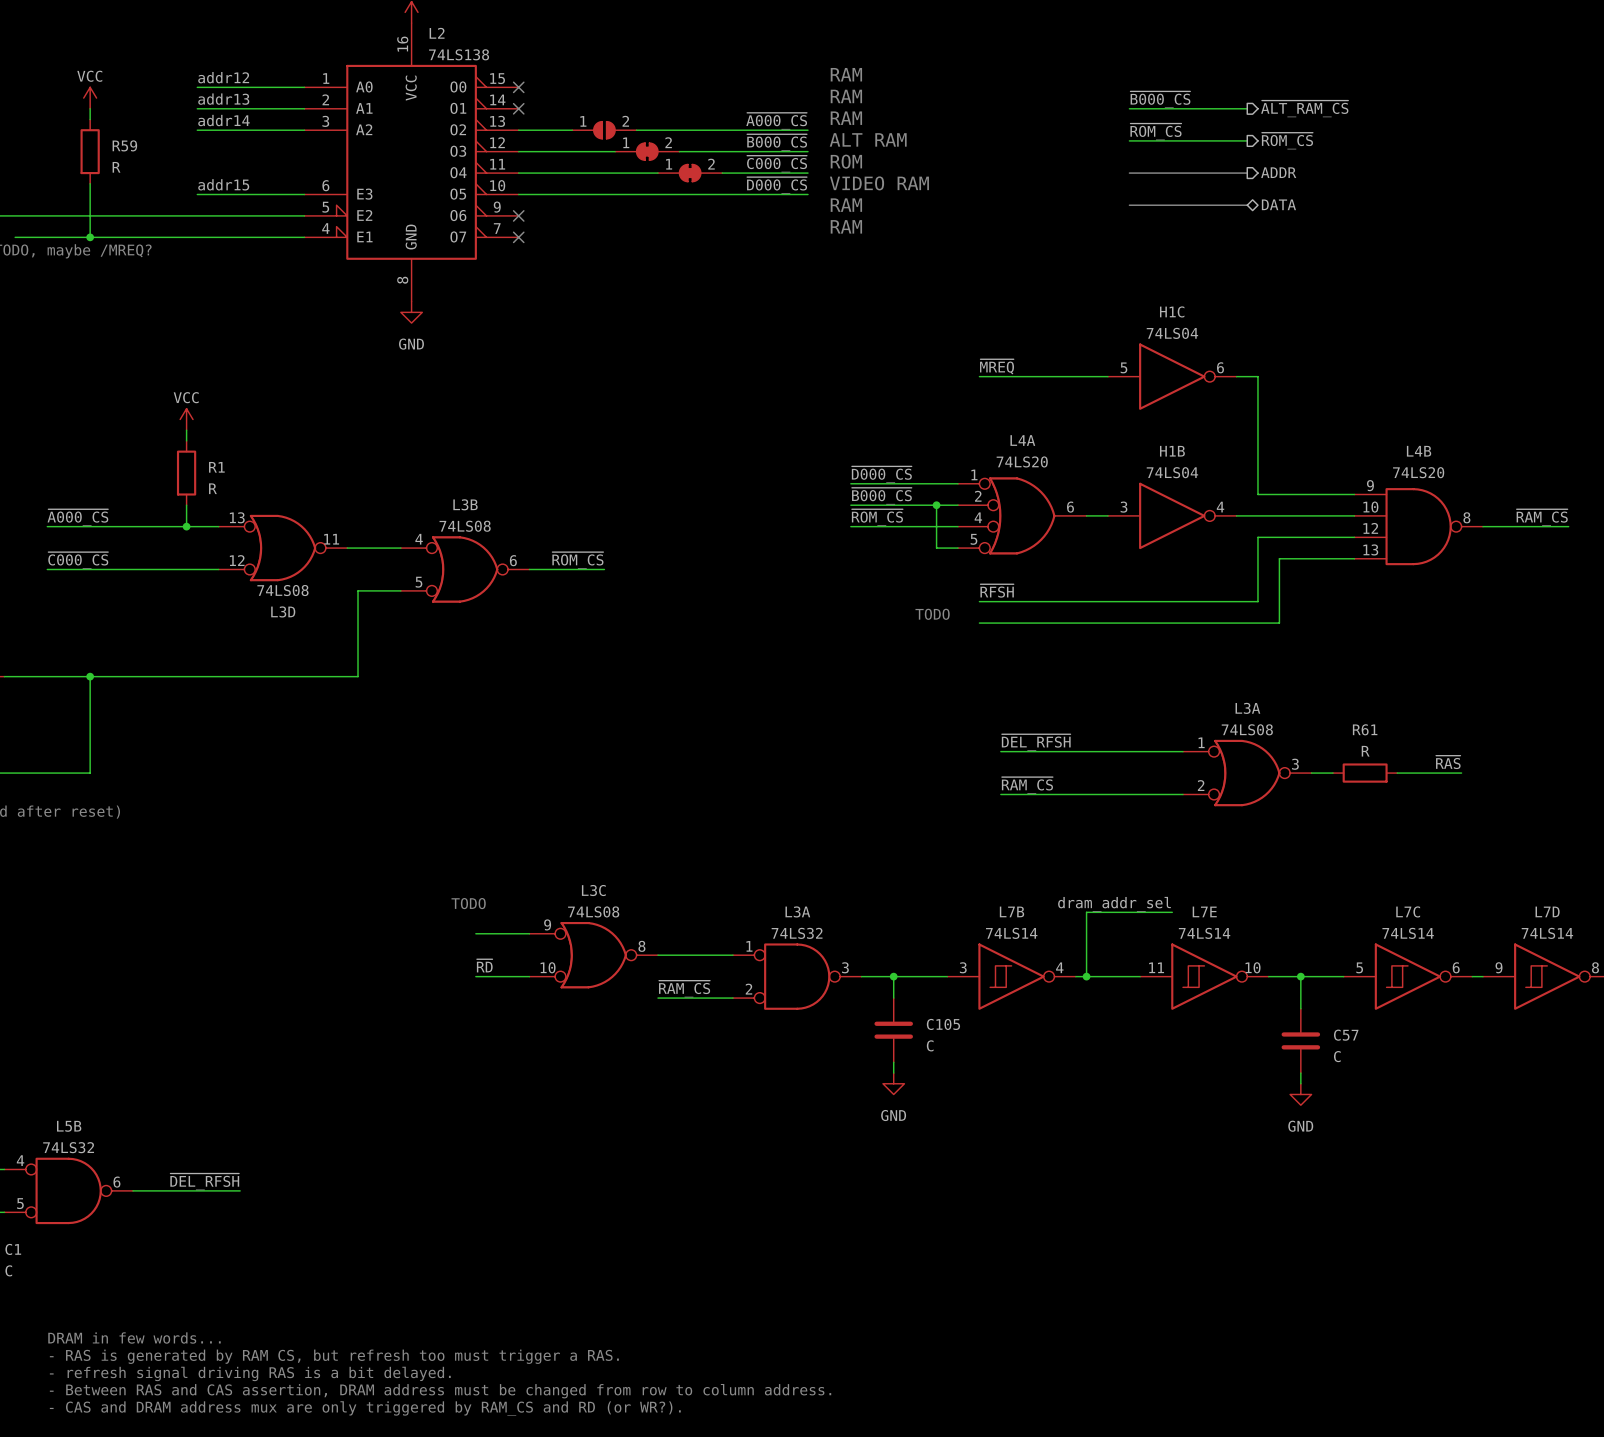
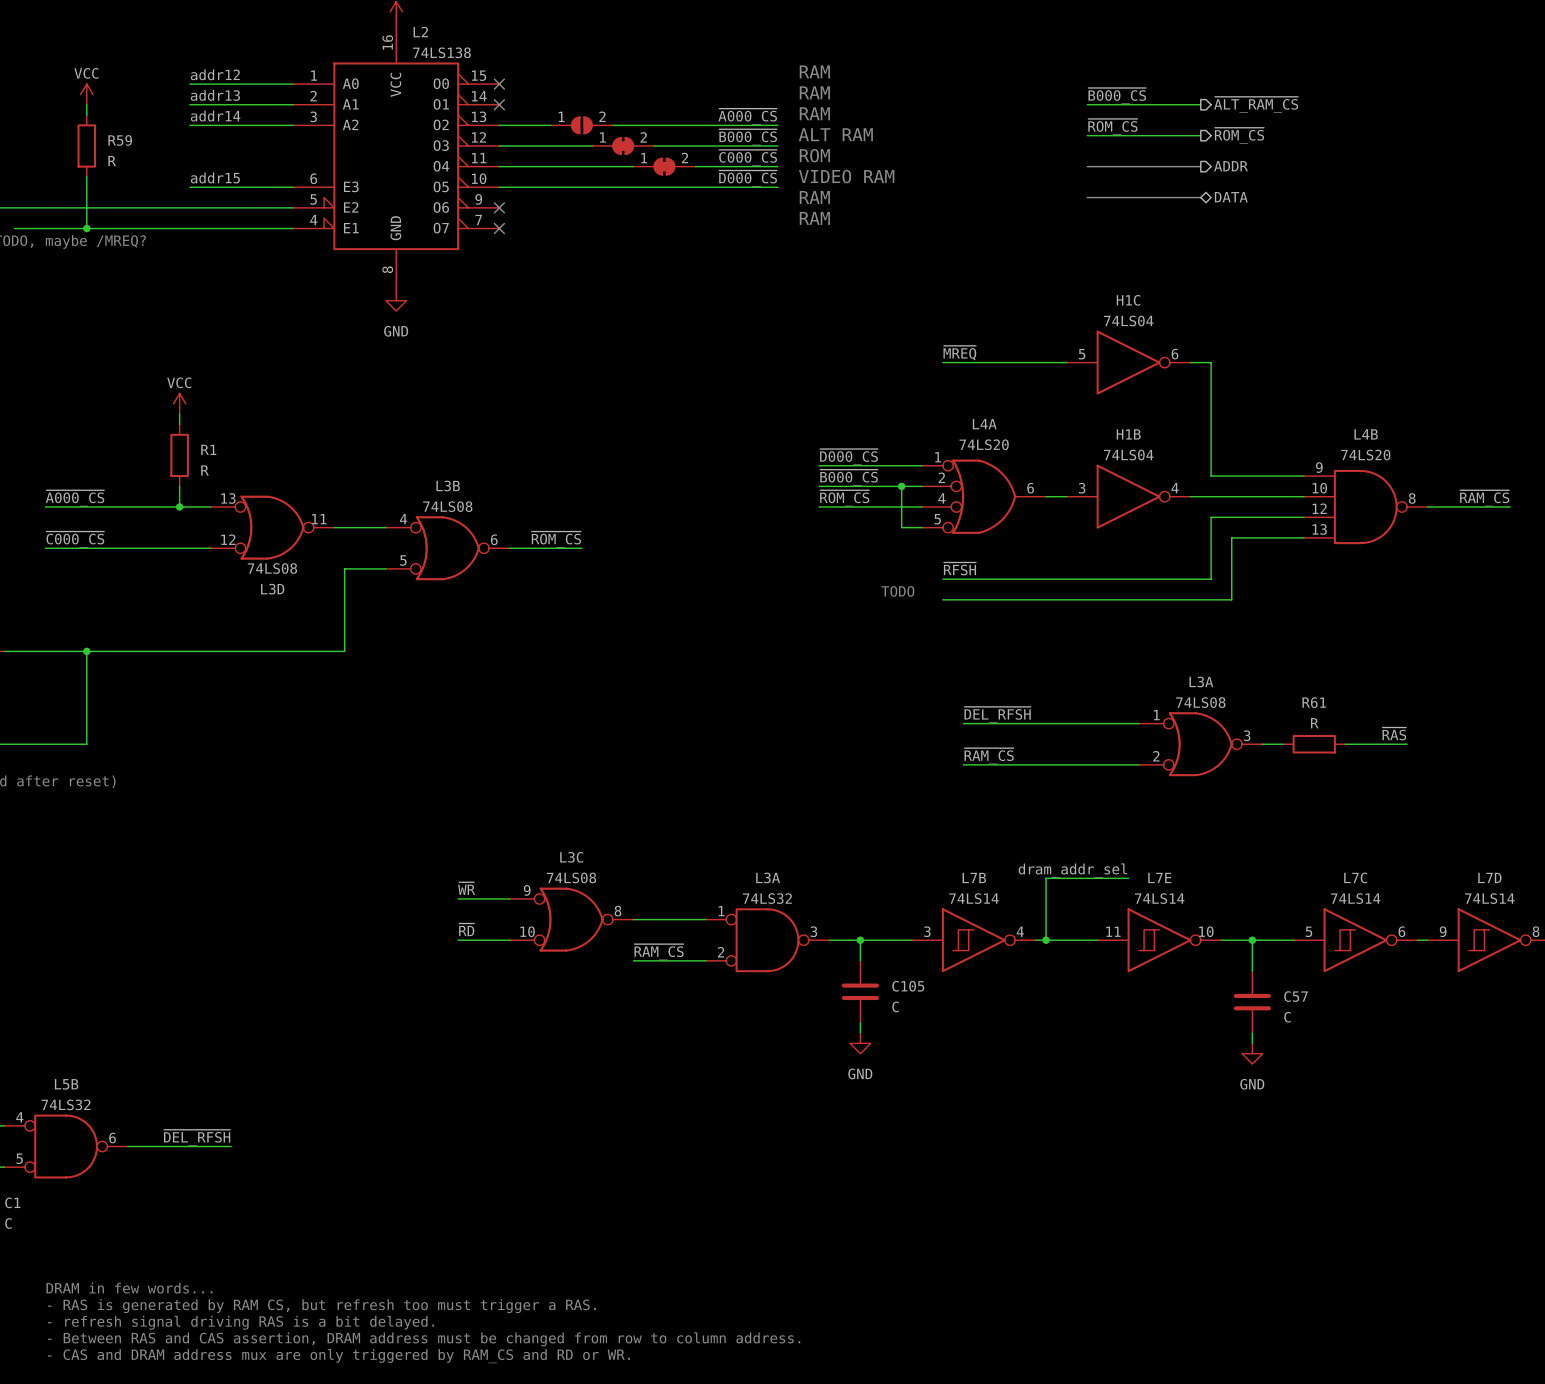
text: TODO (468, 903) -> none
label: none -> ~{WR} (466, 888)
text: - CAS and DRAM address mux are only triggered by RAM_CS and RD (or WR?). (365, 1408) -> - CAS and DRAM address mux are only triggered by RAM_CS and RD or WR. (338, 1356)

